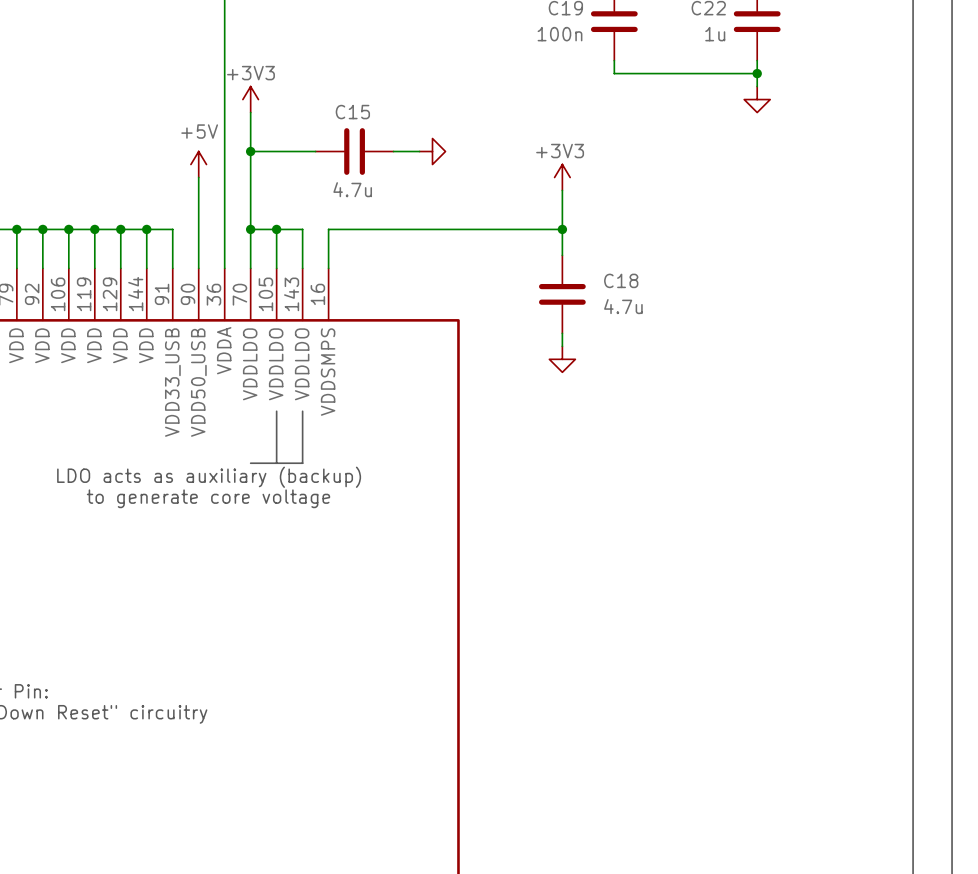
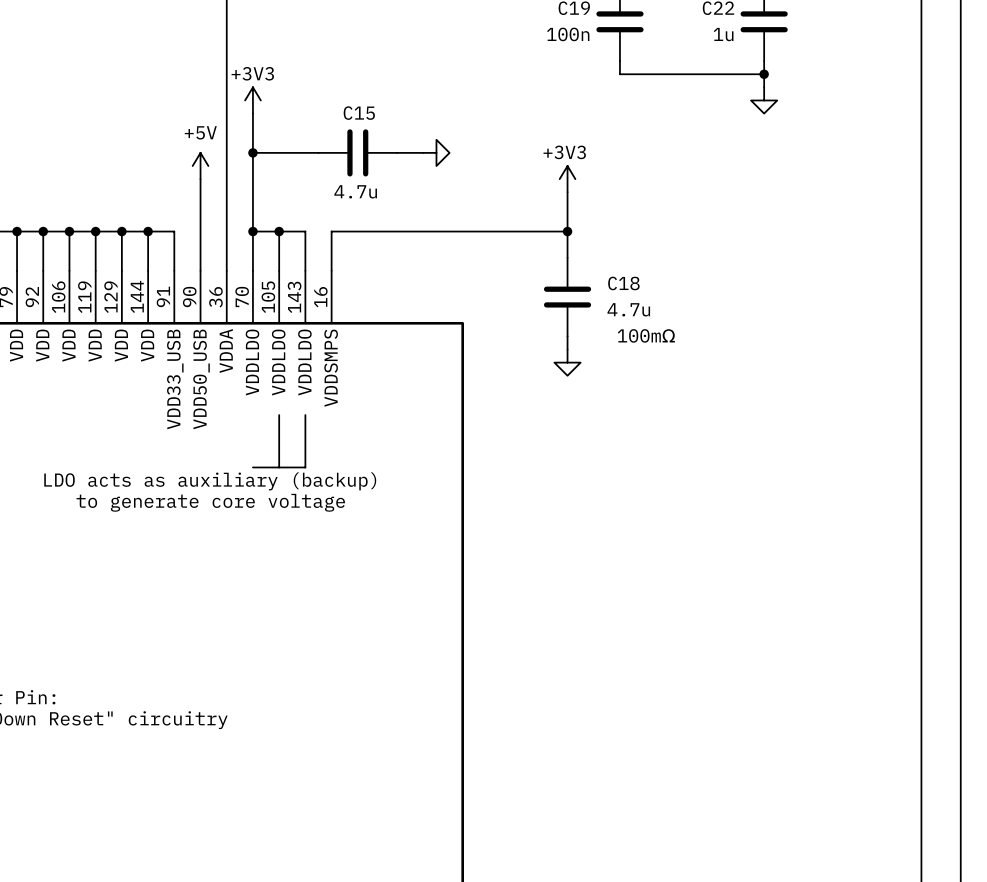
C18 text: none -> 100mΩ (646, 335)

